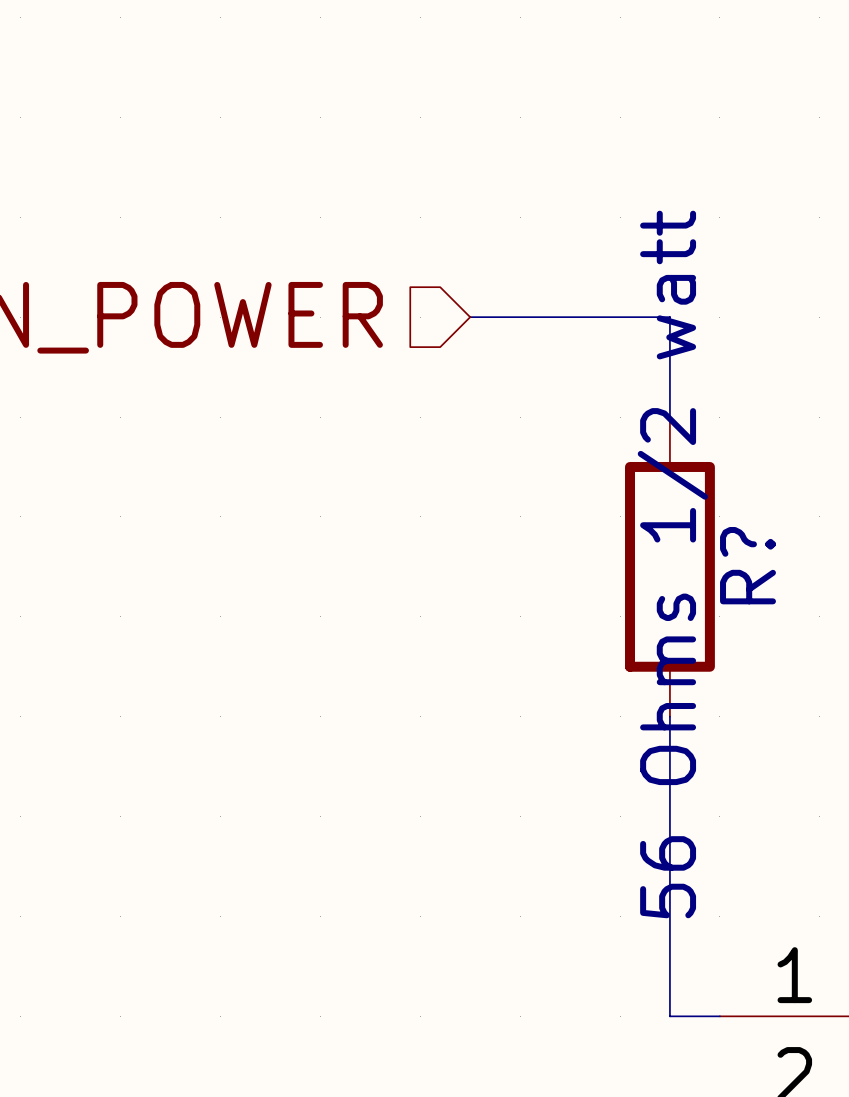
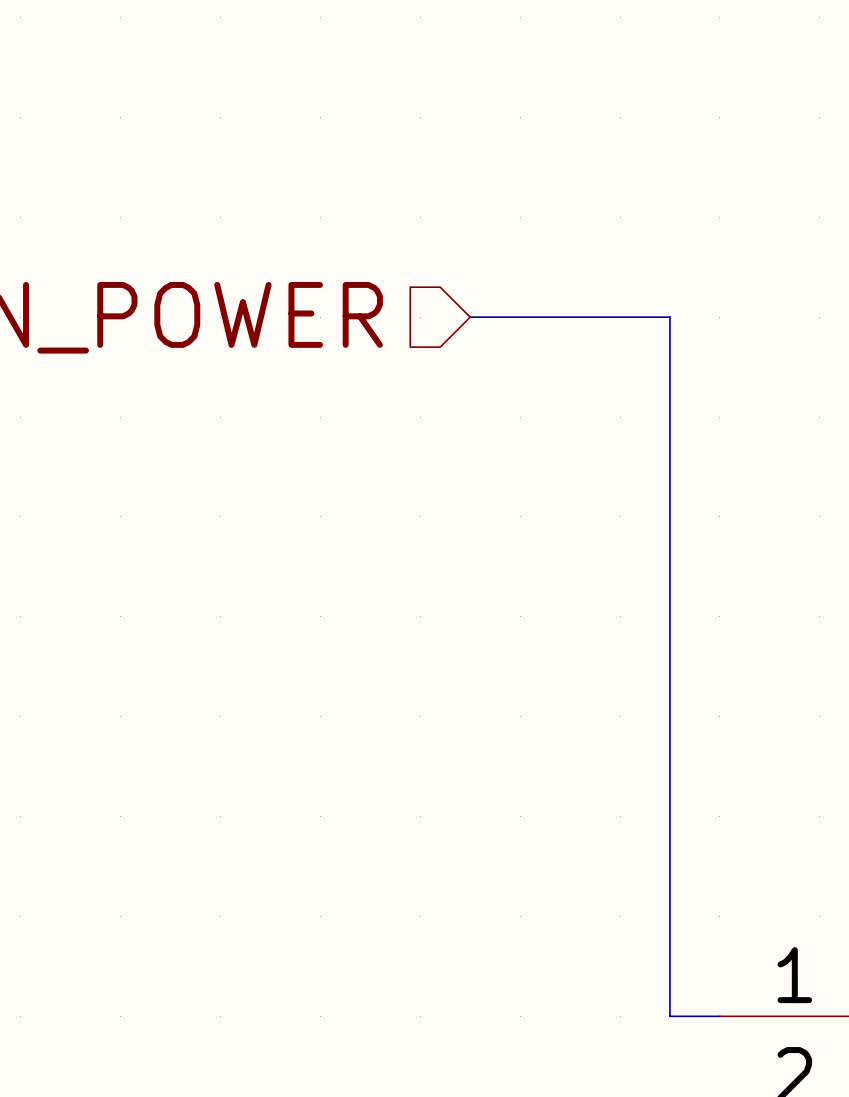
wire: none -> (669, 417) (669, 716)
R?: 56 Ohms 1/2 watt (669, 566) -> none

